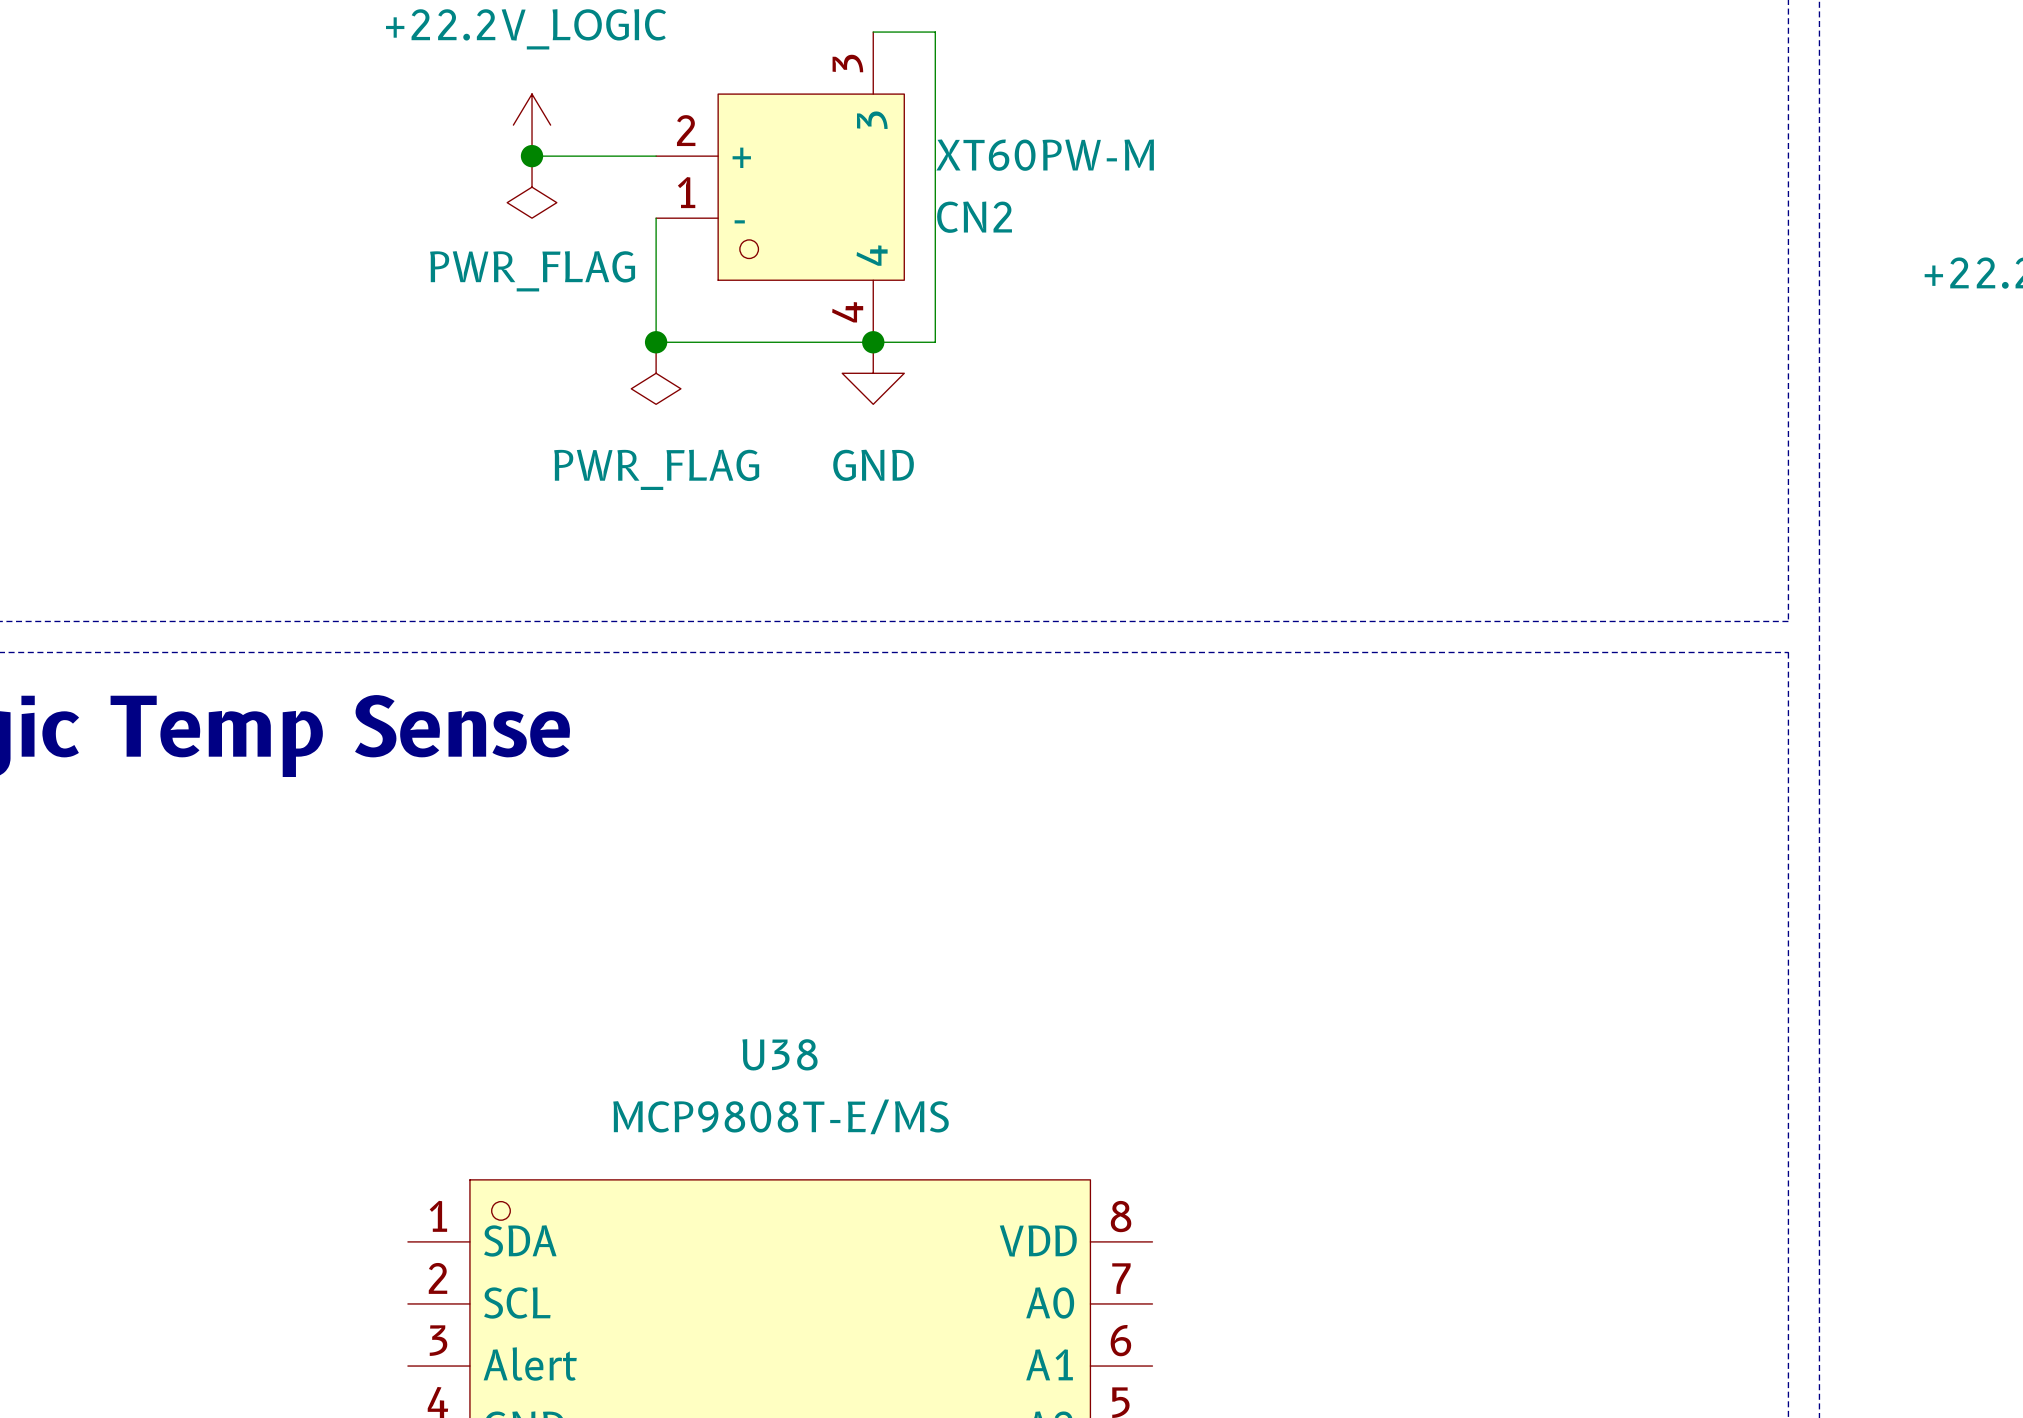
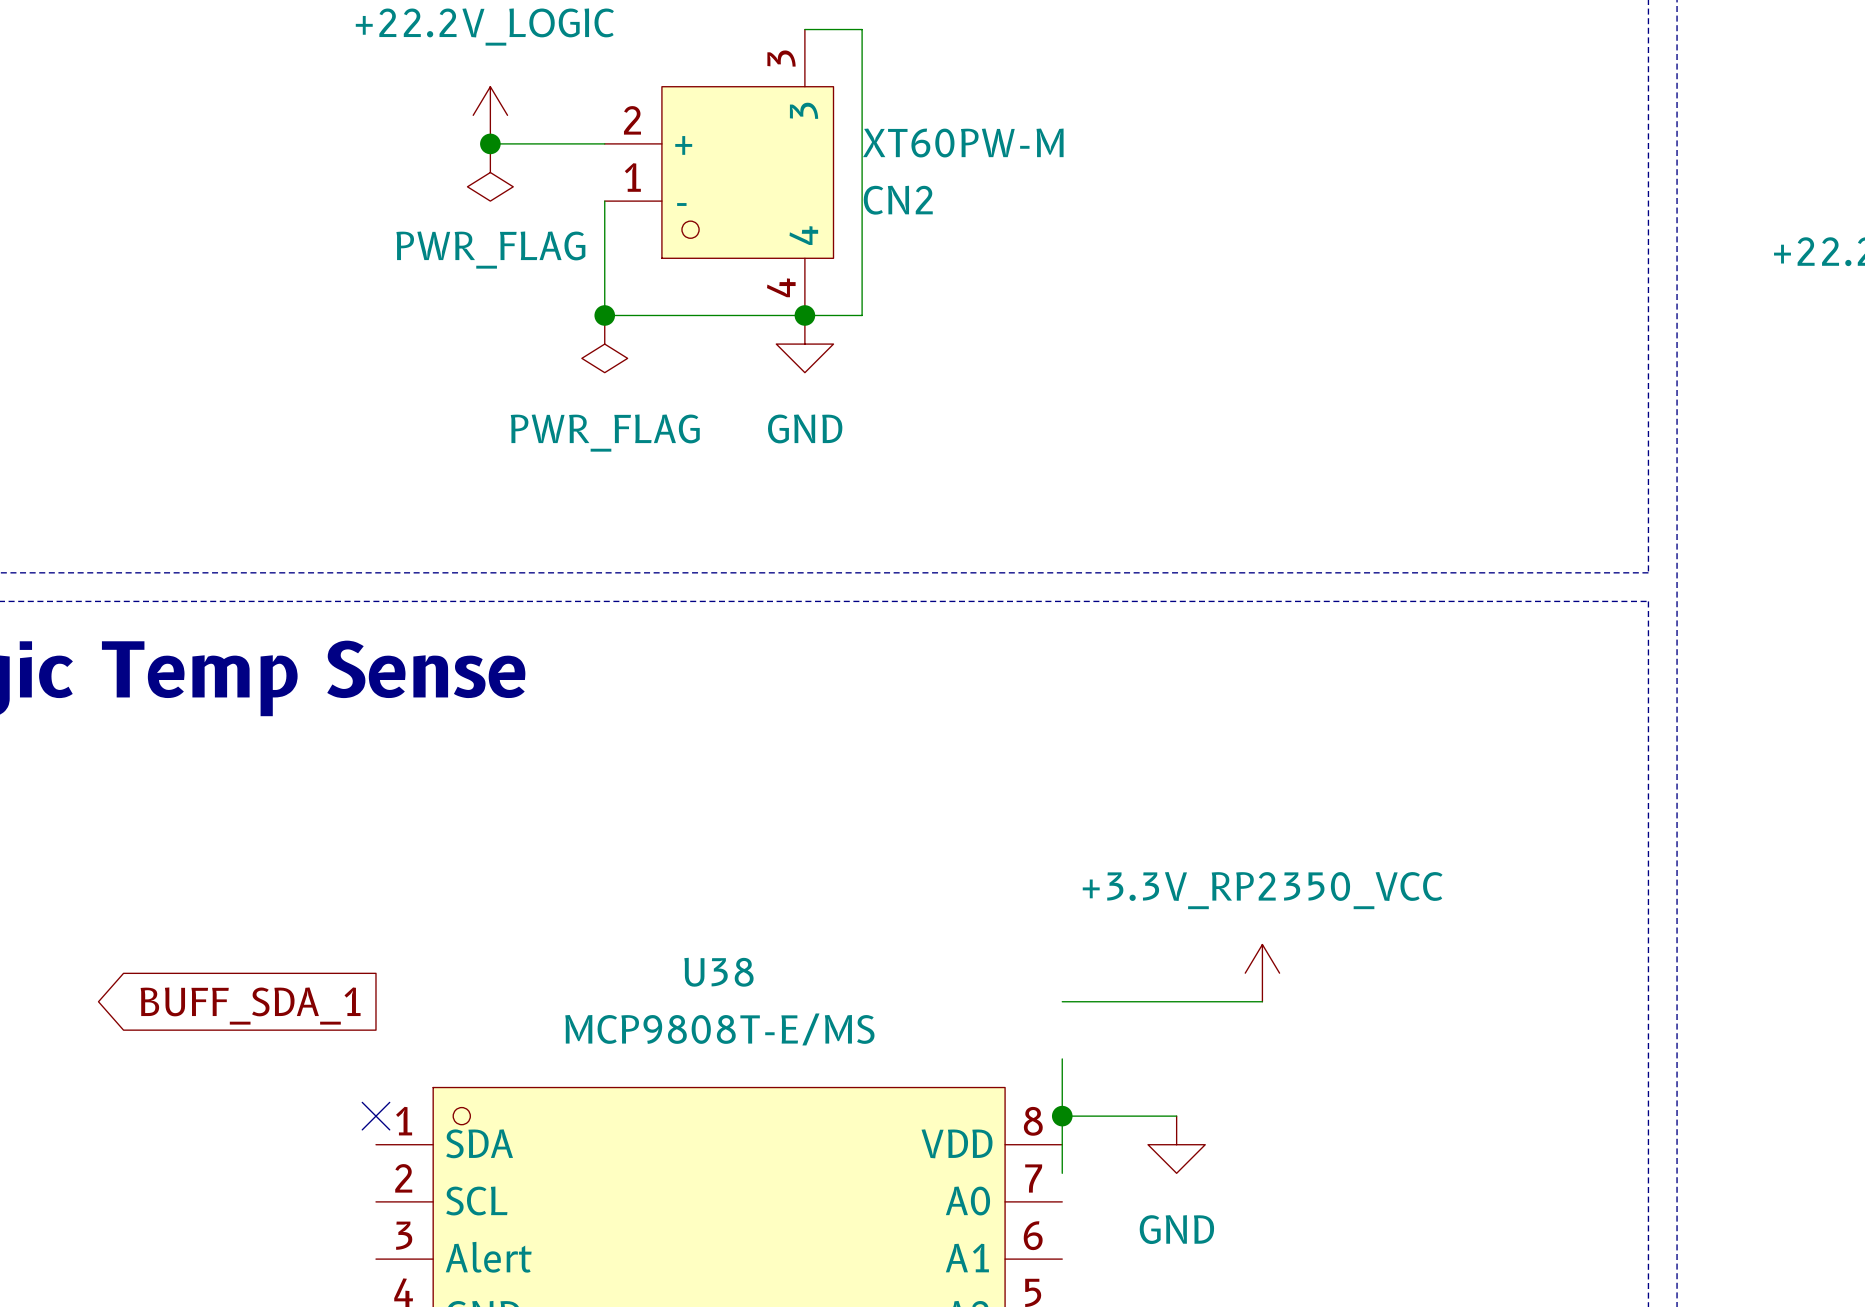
power symbol: none -> +3.3V_RP2350_VCC (1262, 973)
wire: none -> (1062, 1001) (1262, 1001)
global label: none -> BUFF_SDA_1 (250, 1006)
wire: none -> (1062, 1058) (1062, 1173)
no-connect mark: none -> (375, 1116)
wire: none -> (1062, 1116) (1176, 1116)
junction: none -> (1062, 1116)
power symbol: none -> GND (1176, 1144)

